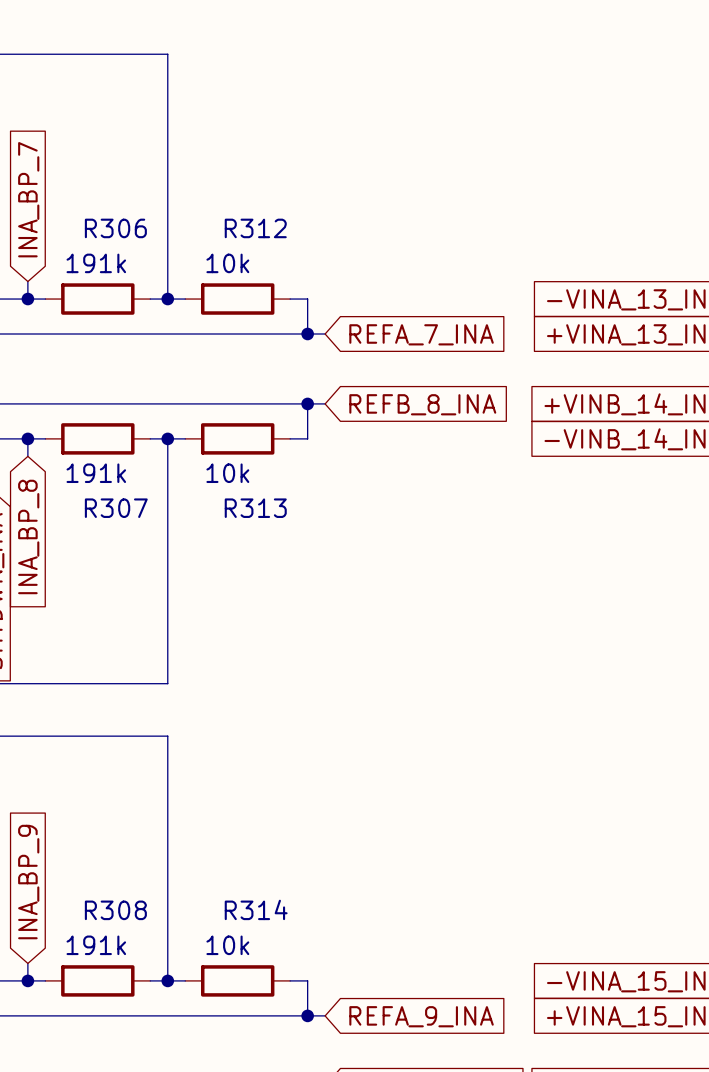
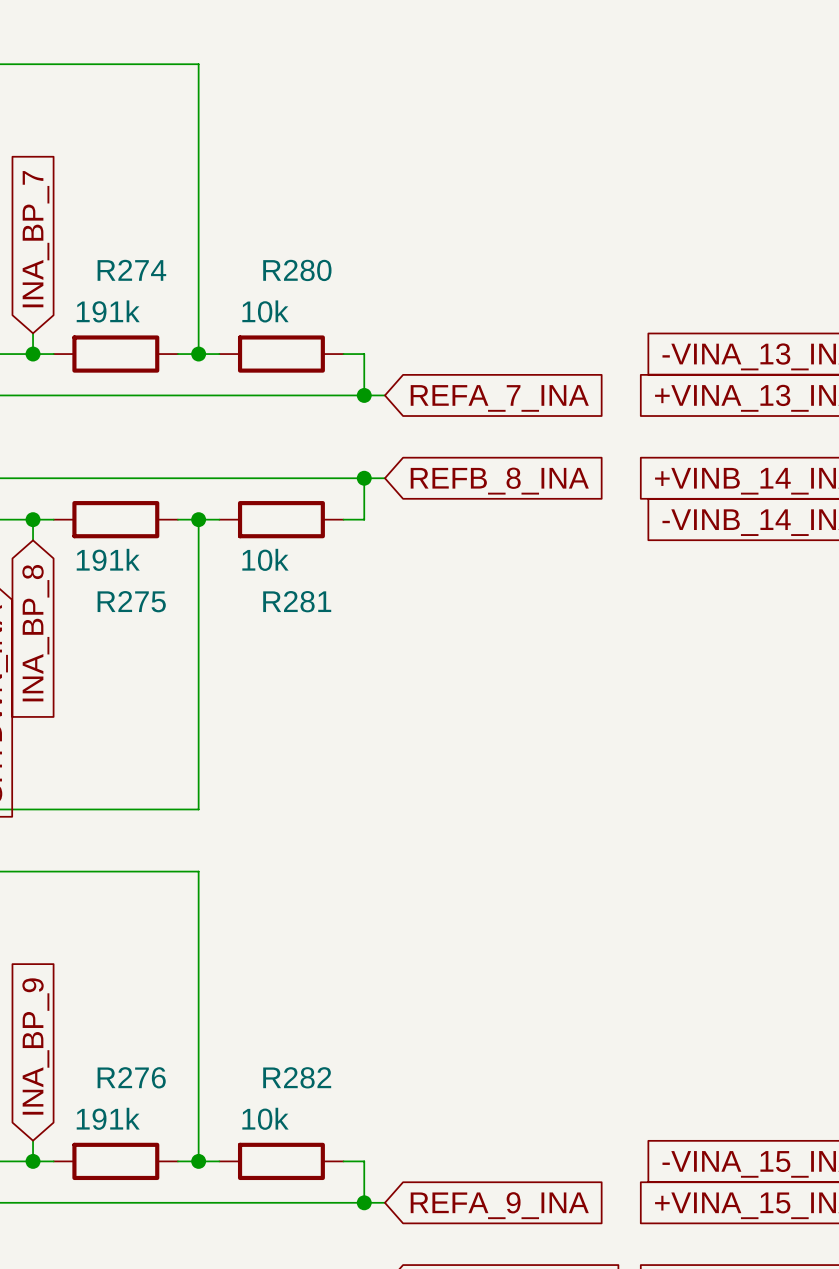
R306 name: R306 (115, 228) -> R274 (131, 270)
R312 name: R312 (255, 228) -> R280 (297, 270)
R307 name: R307 (116, 508) -> R275 (131, 601)
R313 name: R313 (255, 508) -> R281 (297, 601)
R314 name: R314 (256, 909) -> R282 (297, 1077)
R308 name: R308 (115, 910) -> R276 (131, 1077)

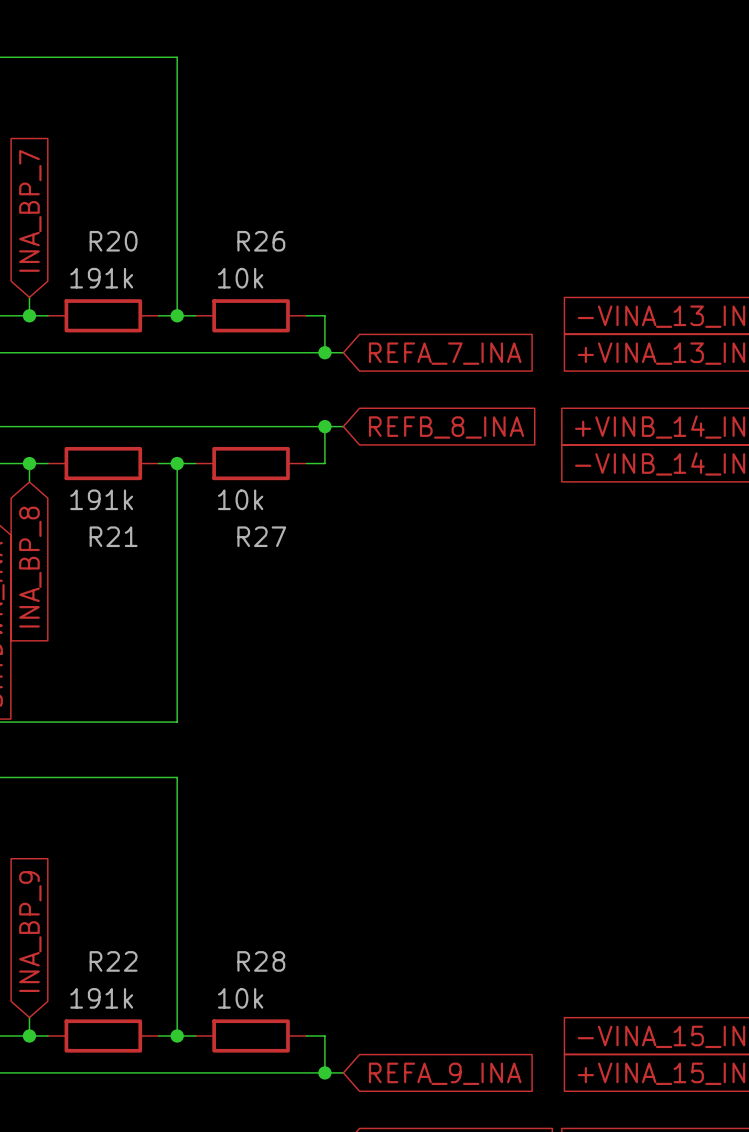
R274 name: R274 (131, 270) -> R20 (113, 241)
R280 name: R280 (297, 270) -> R26 (261, 241)
R275 name: R275 (131, 601) -> R21 (113, 536)
R281 name: R281 (297, 601) -> R27 (261, 536)
R276 name: R276 (131, 1077) -> R22 (113, 961)
R282 name: R282 (297, 1077) -> R28 (261, 961)

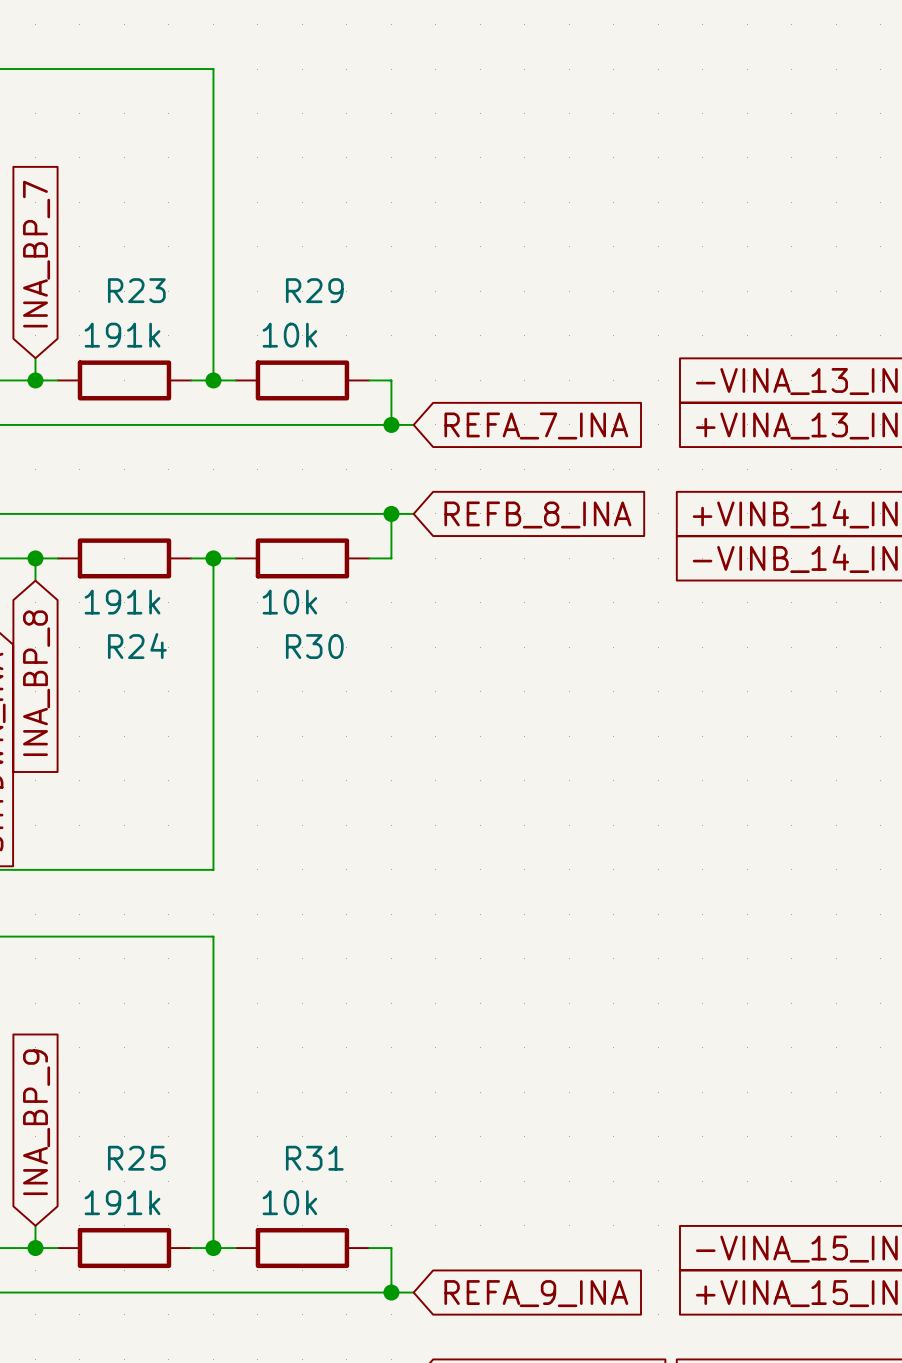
R20 name: R20 (113, 241) -> R23 (136, 290)
R26 name: R26 (261, 241) -> R29 (314, 290)
R21 name: R21 (113, 536) -> R24 (137, 646)
R27 name: R27 (261, 536) -> R30 (314, 646)
R22 name: R22 (113, 961) -> R25 (136, 1158)
R28 name: R28 (261, 961) -> R31 (314, 1158)

